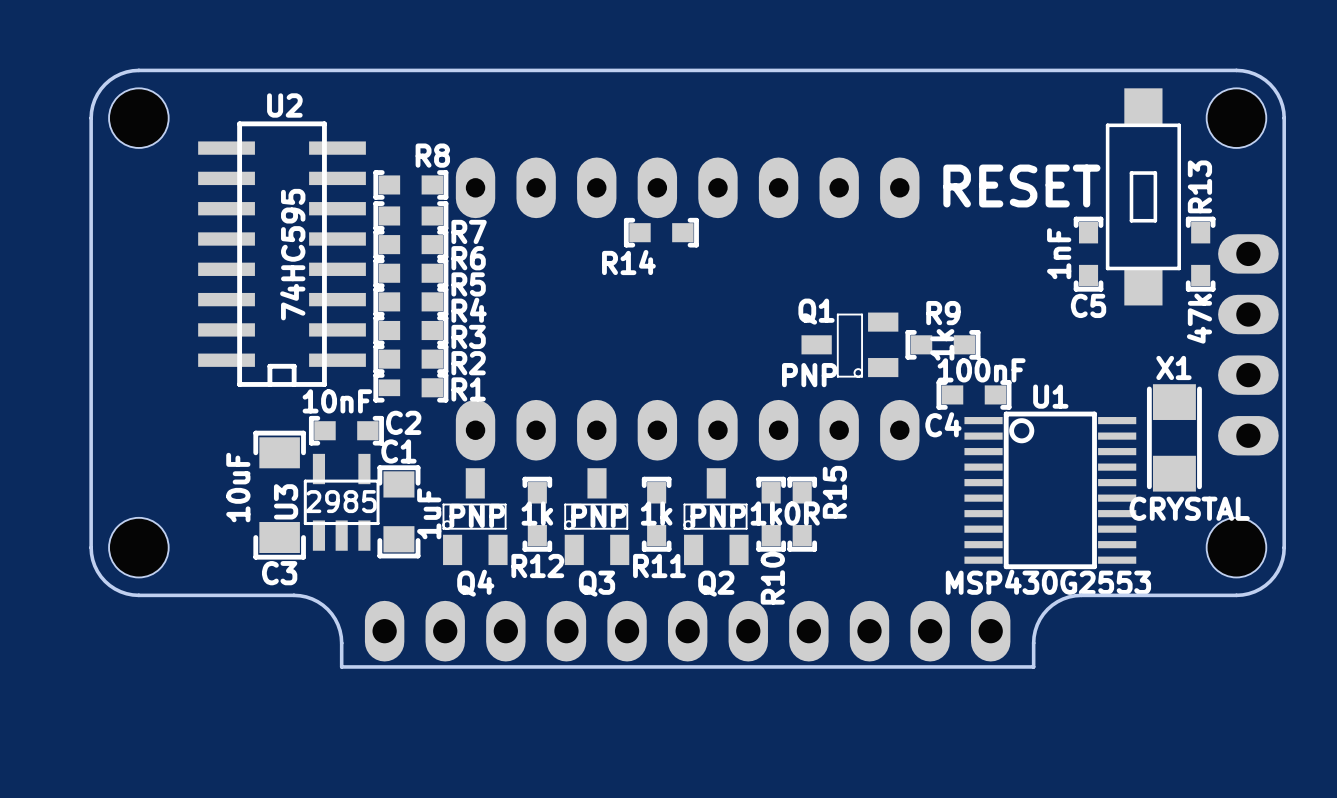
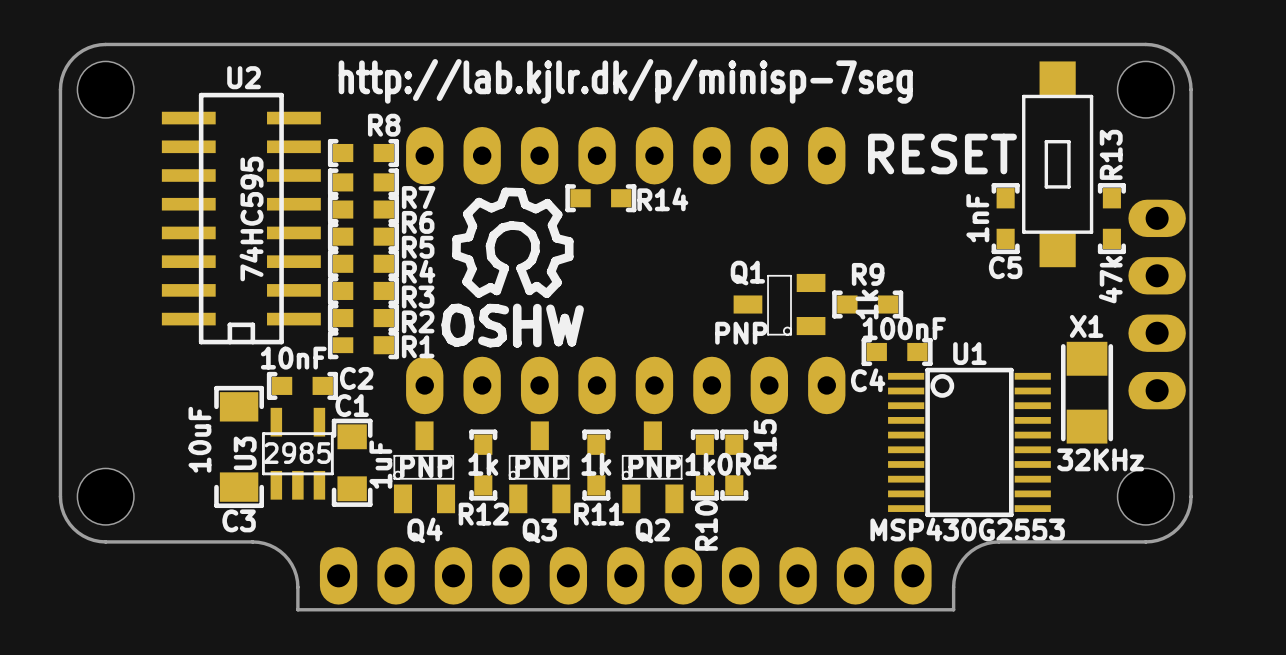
text: none -> http://lab.kjlr.dk/p/minisp-7seg (625, 81)
drawing: none -> [441, 187, 584, 348]
R14 name position: R14 (628, 262) -> R14 (662, 199)
X1 value: CRYSTAL (1189, 508) -> 32KHz (1100, 459)

